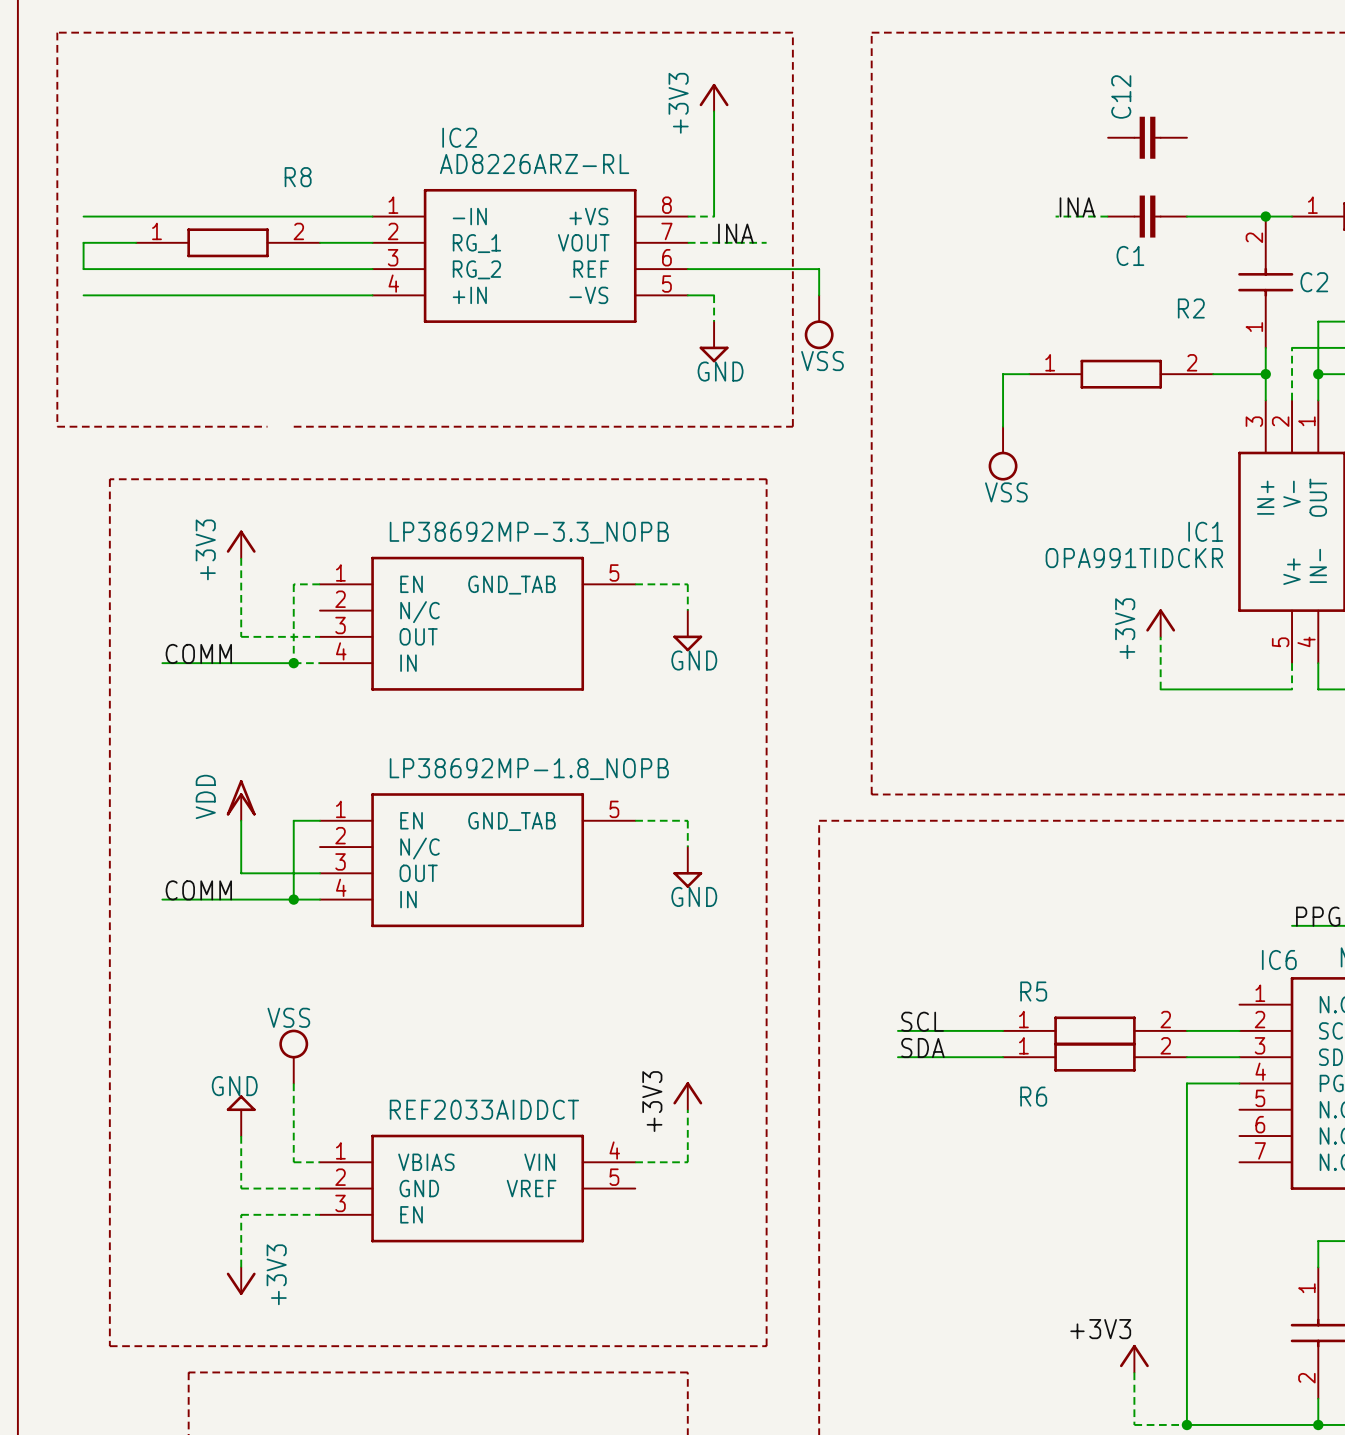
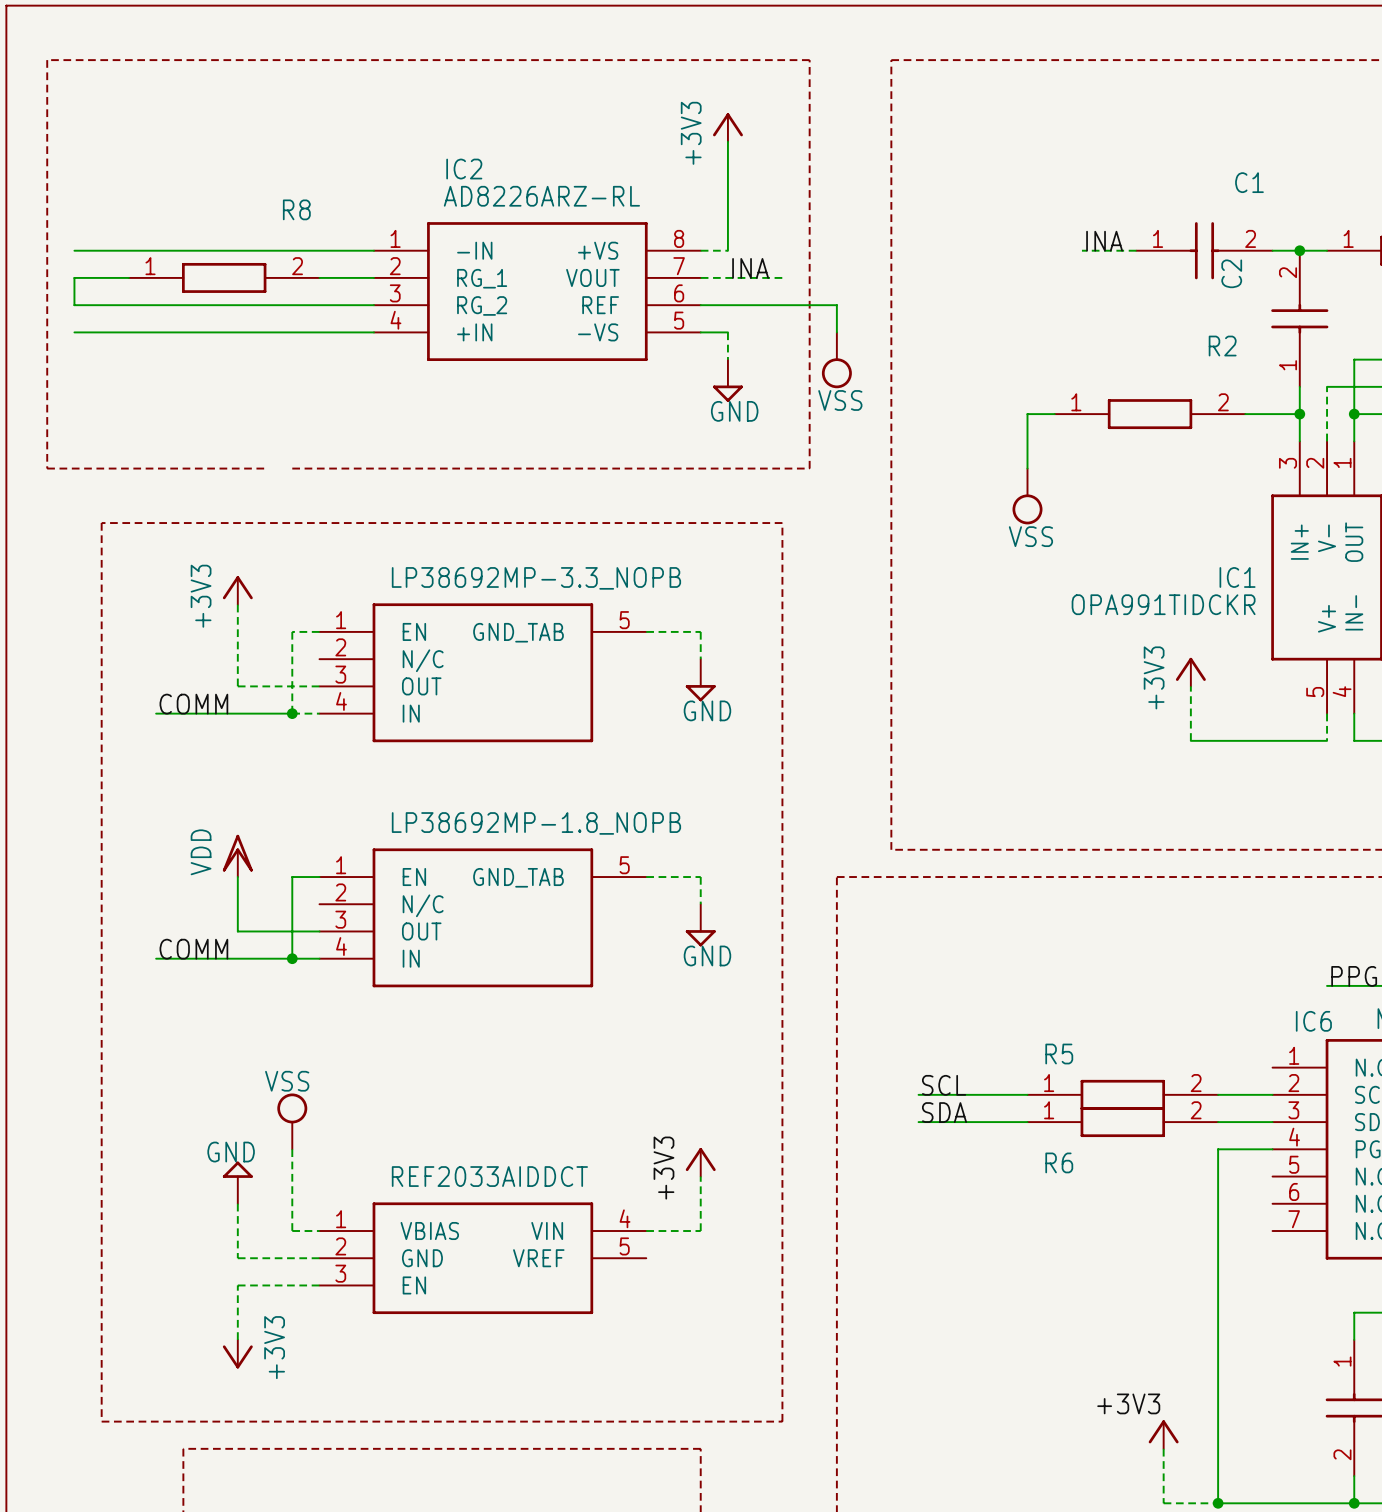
C12: (1147, 137) -> none
C1 symbol: [1108, 195, 1187, 238] -> [1136, 222, 1273, 280]
C1 name position: C1 (1130, 255) -> C1 (1249, 182)
C2 name rotation: 0° (1314, 282) -> 90° counterclockwise (1231, 273)
C2 name position: C2 (1314, 282) -> C2 (1231, 273)

